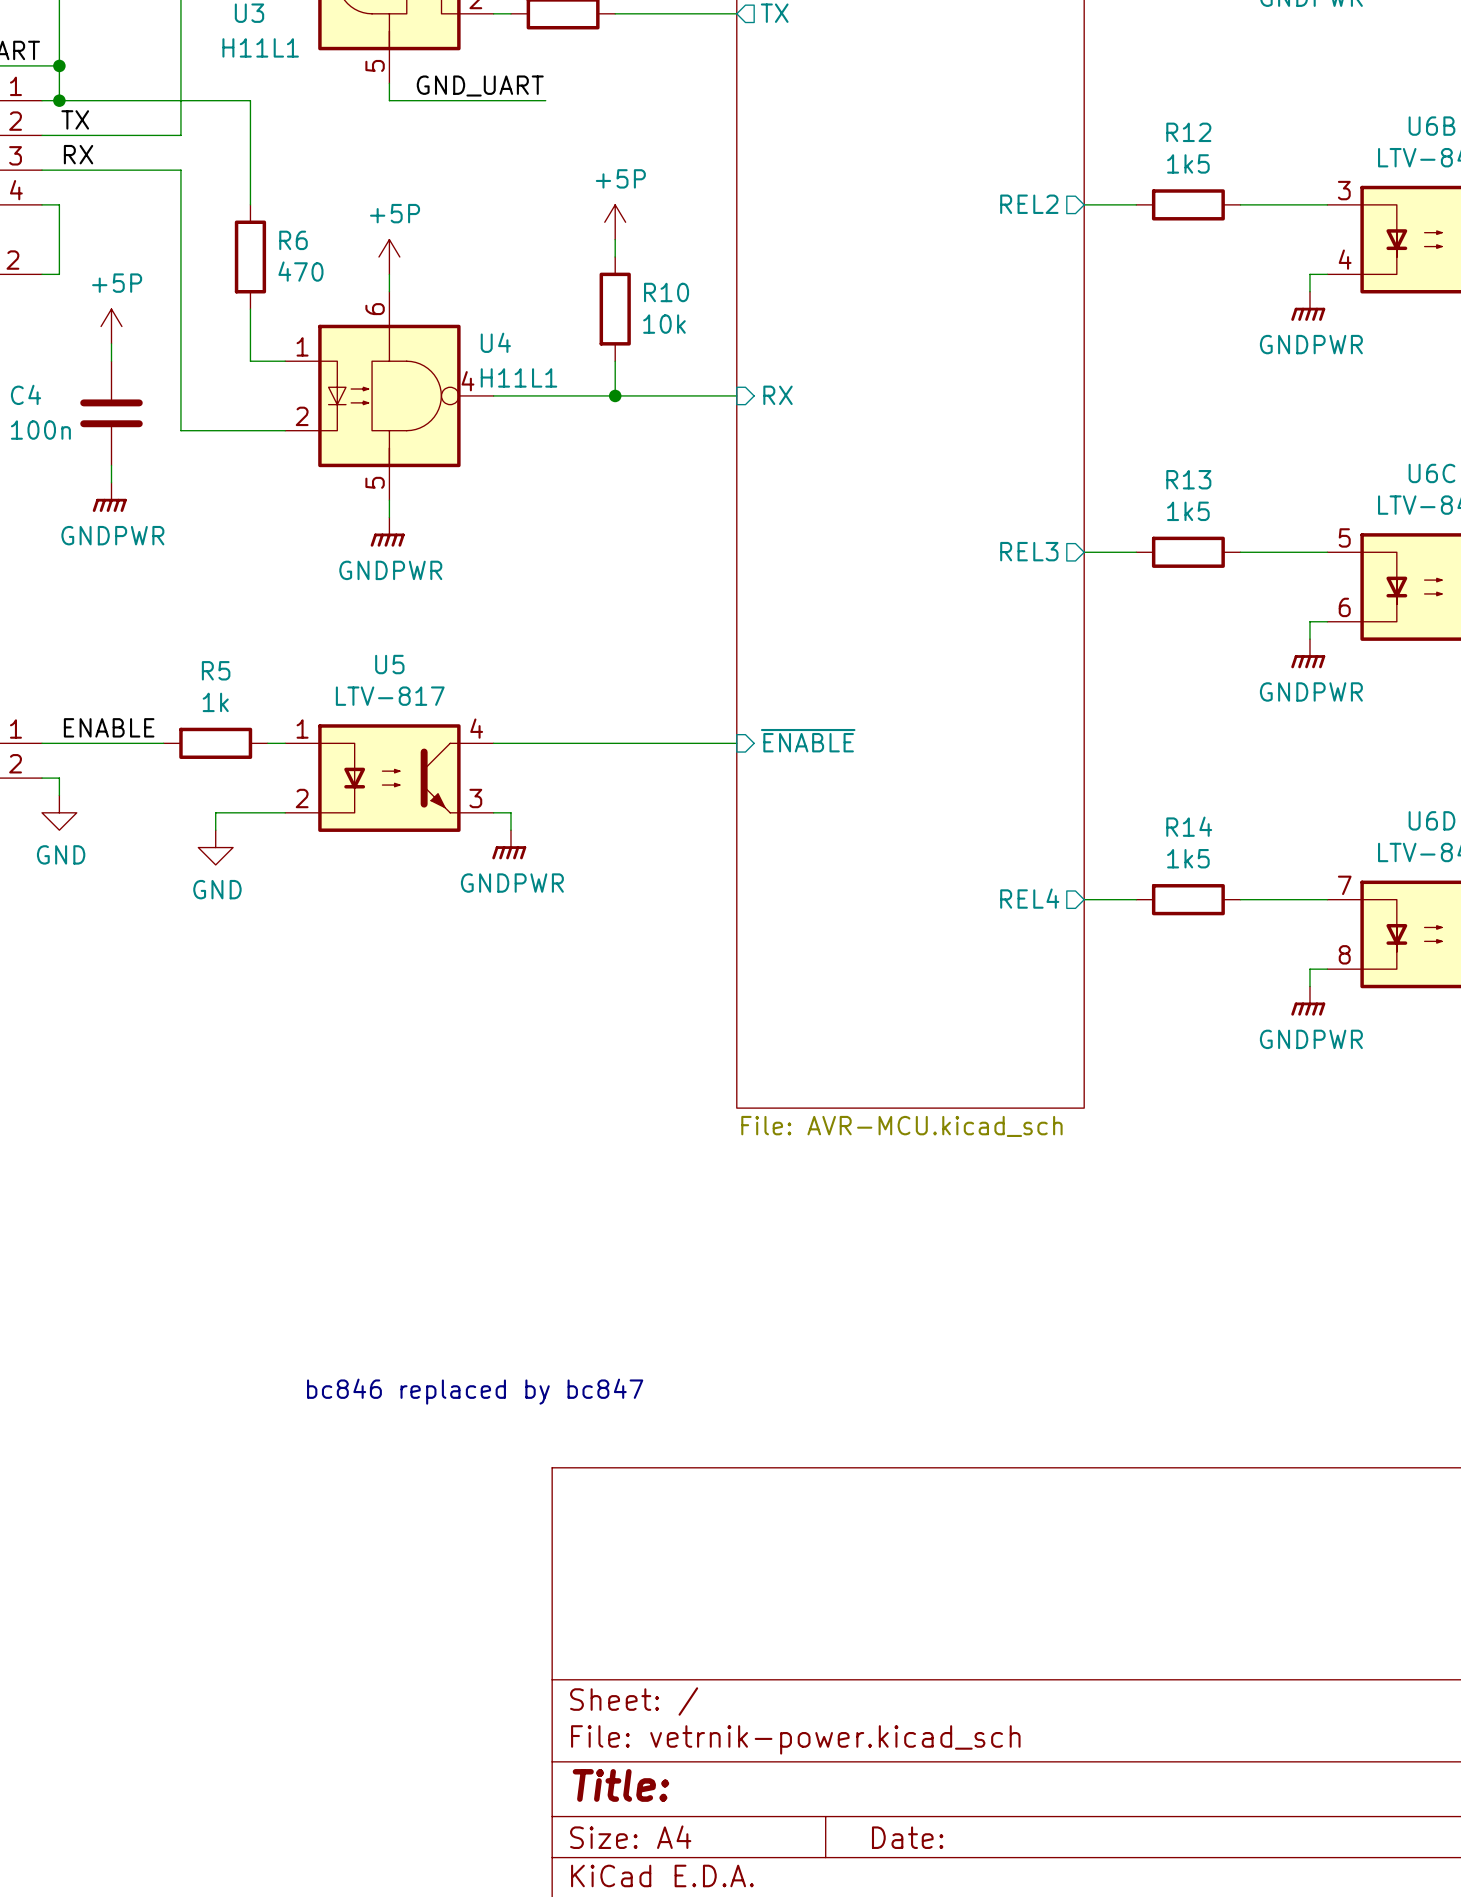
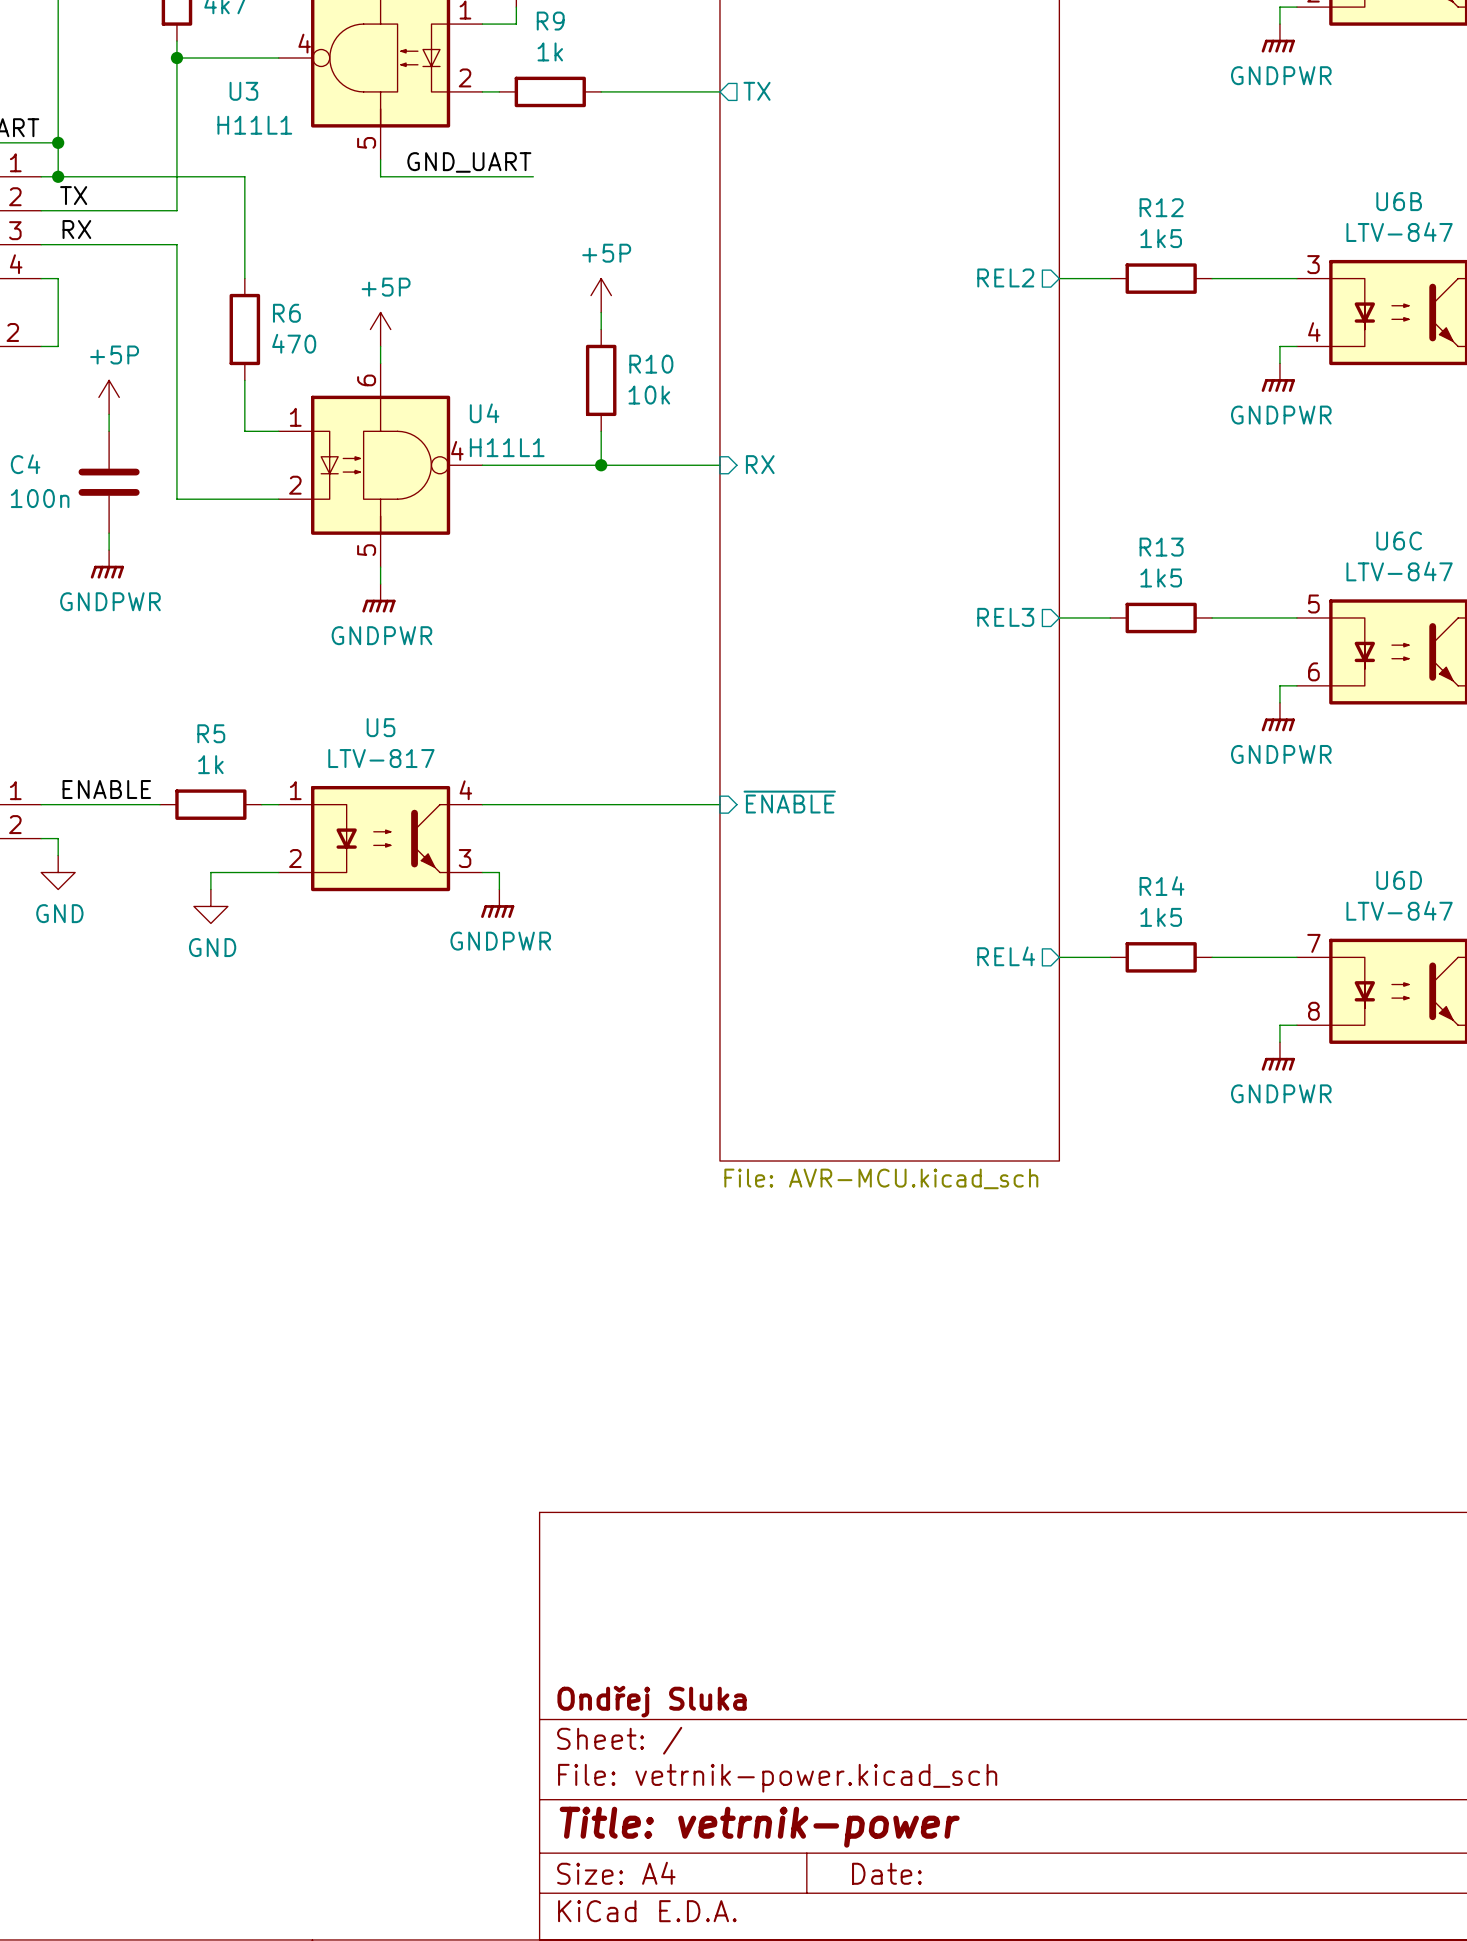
text: bc846 replaced by bc847 (475, 1391) -> none
title block: none -> Ondřej Sluka (651, 1701)
title block: Title: (620, 1785) -> Title: vetrnik-power (759, 1827)

